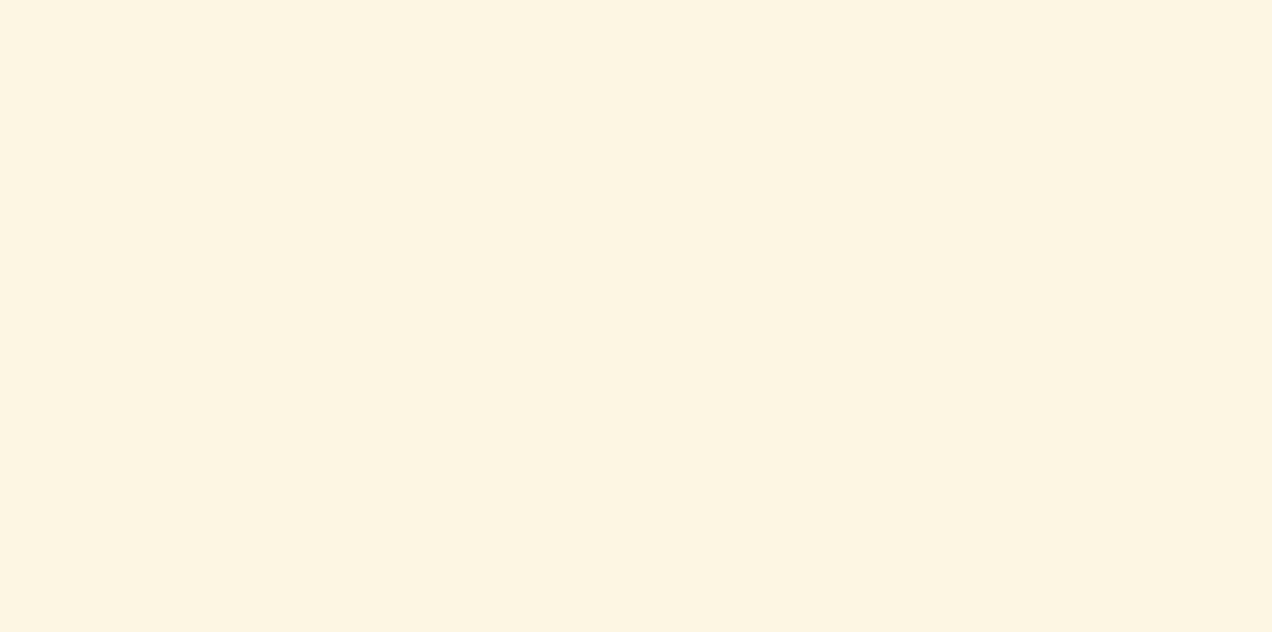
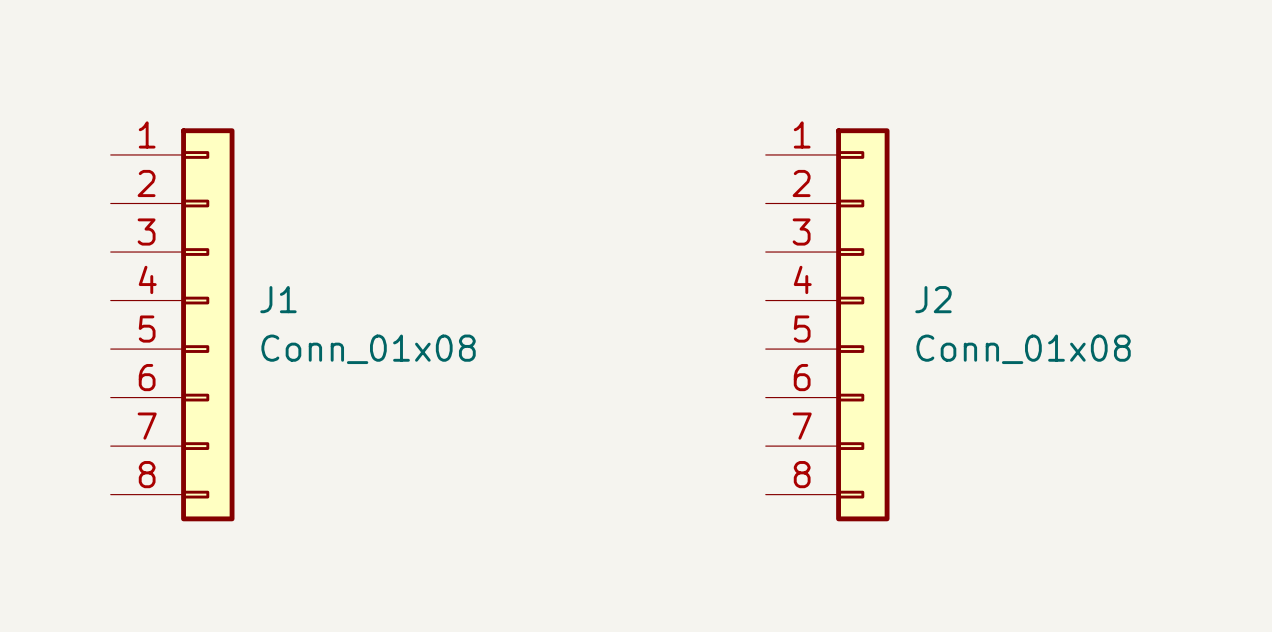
J1: none -> Conn_01x08 (172, 324)
J2: none -> Conn_01x08 (827, 324)

